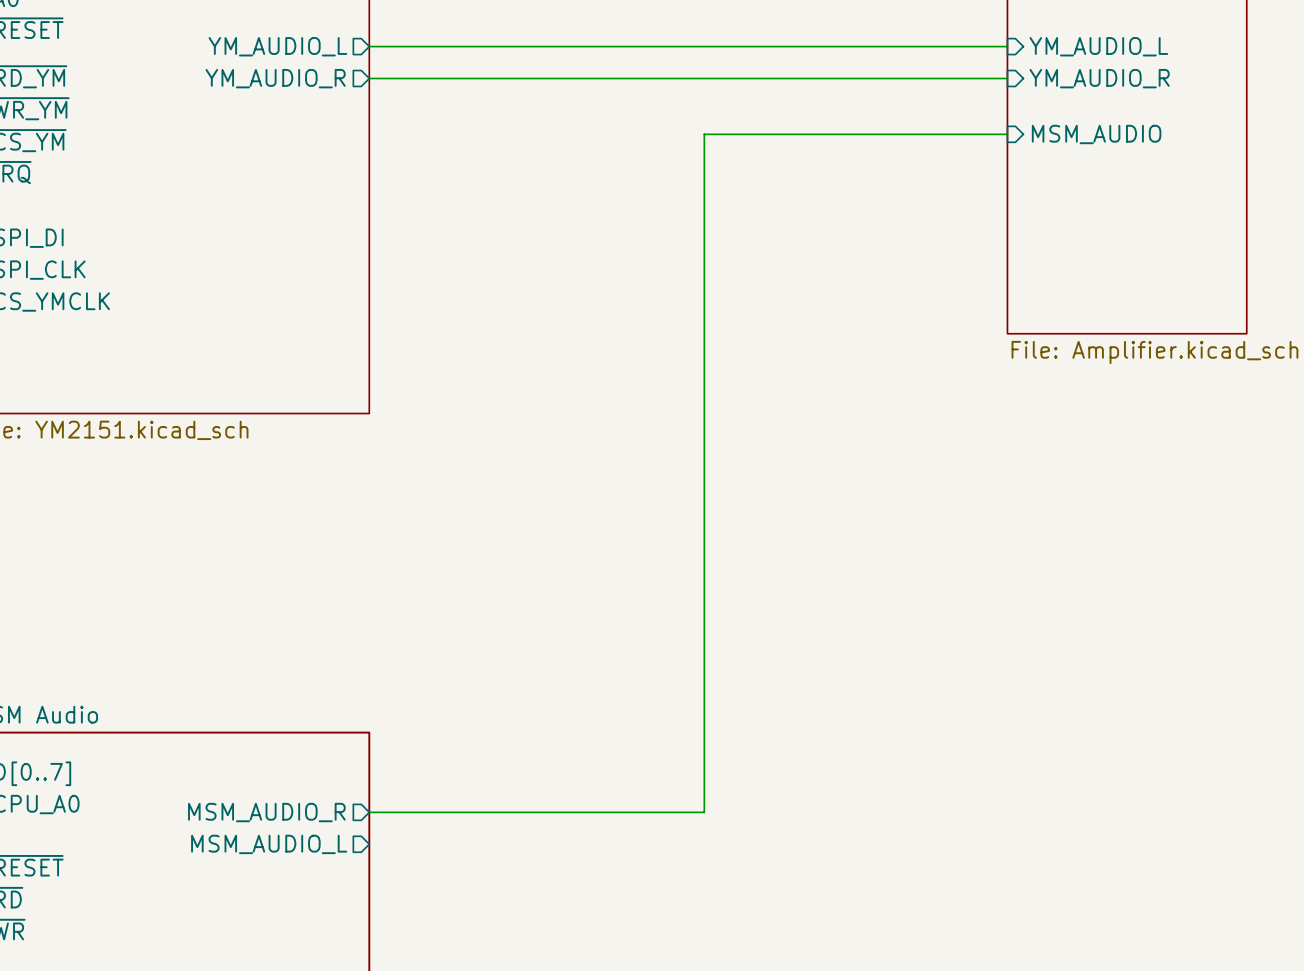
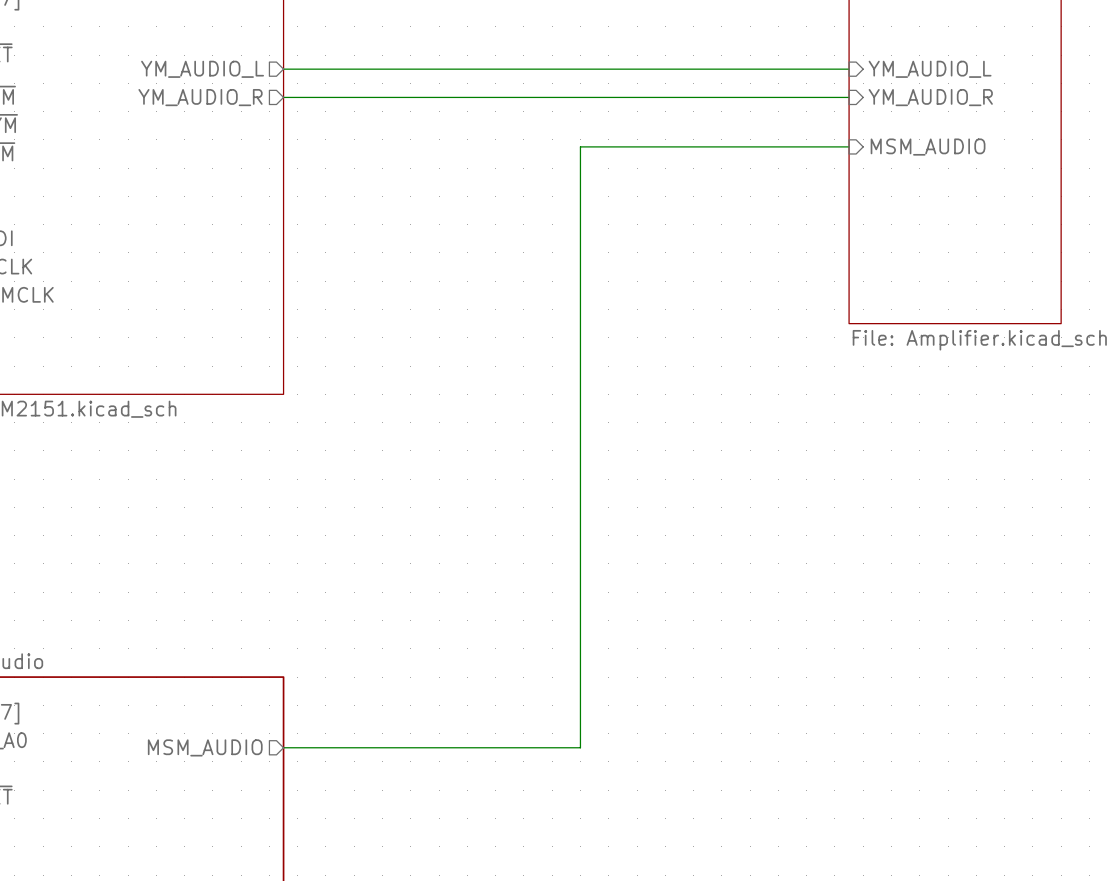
sheet pin: MSM_AUDIO_R (266, 812) -> MSM_AUDIO (205, 747)
sheet pin: MSM_AUDIO_L (269, 844) -> none

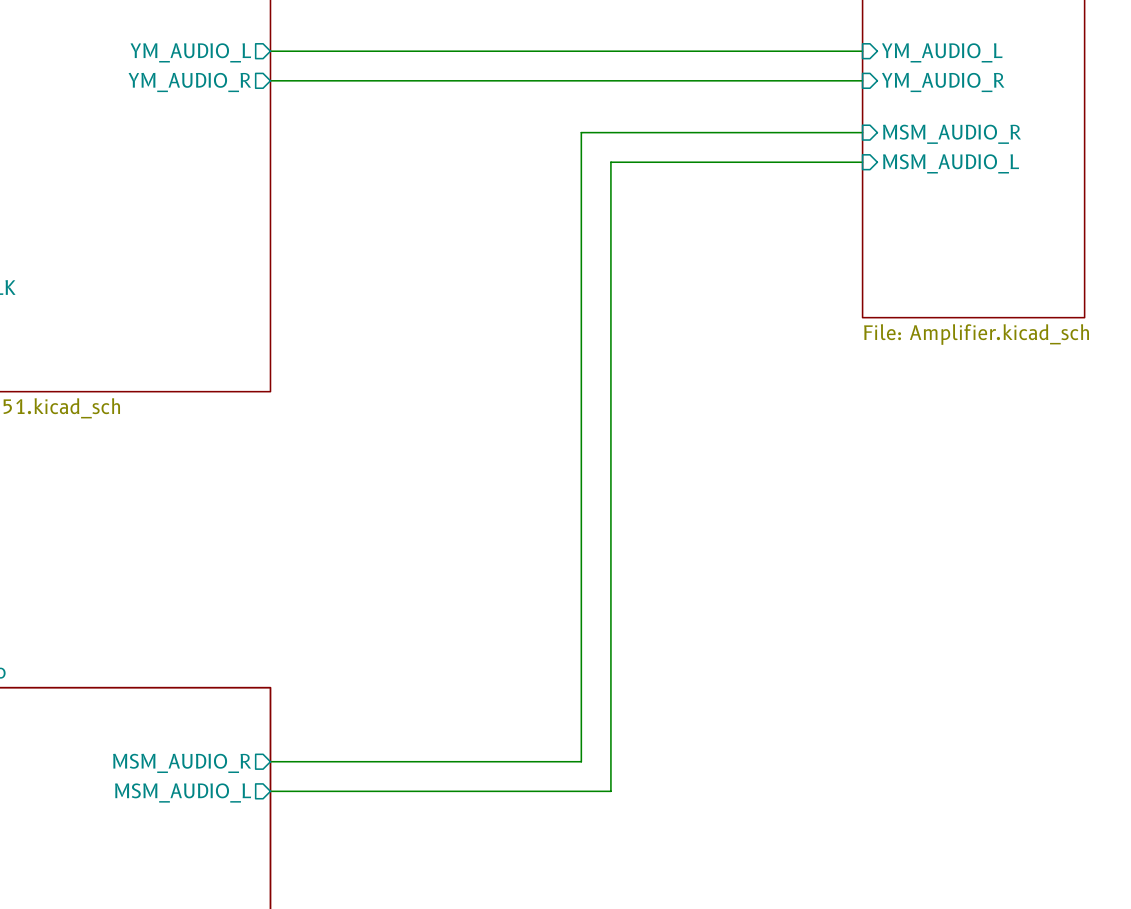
sheet pin: MSM_AUDIO (928, 147) -> MSM_AUDIO_R (952, 134)
wire: none -> (862, 162) (610, 162) (610, 791) (270, 791)
sheet pin: none -> MSM_AUDIO_L (951, 163)
sheet pin: MSM_AUDIO (205, 747) -> MSM_AUDIO_R (182, 763)
sheet pin: none -> MSM_AUDIO_L (183, 792)

